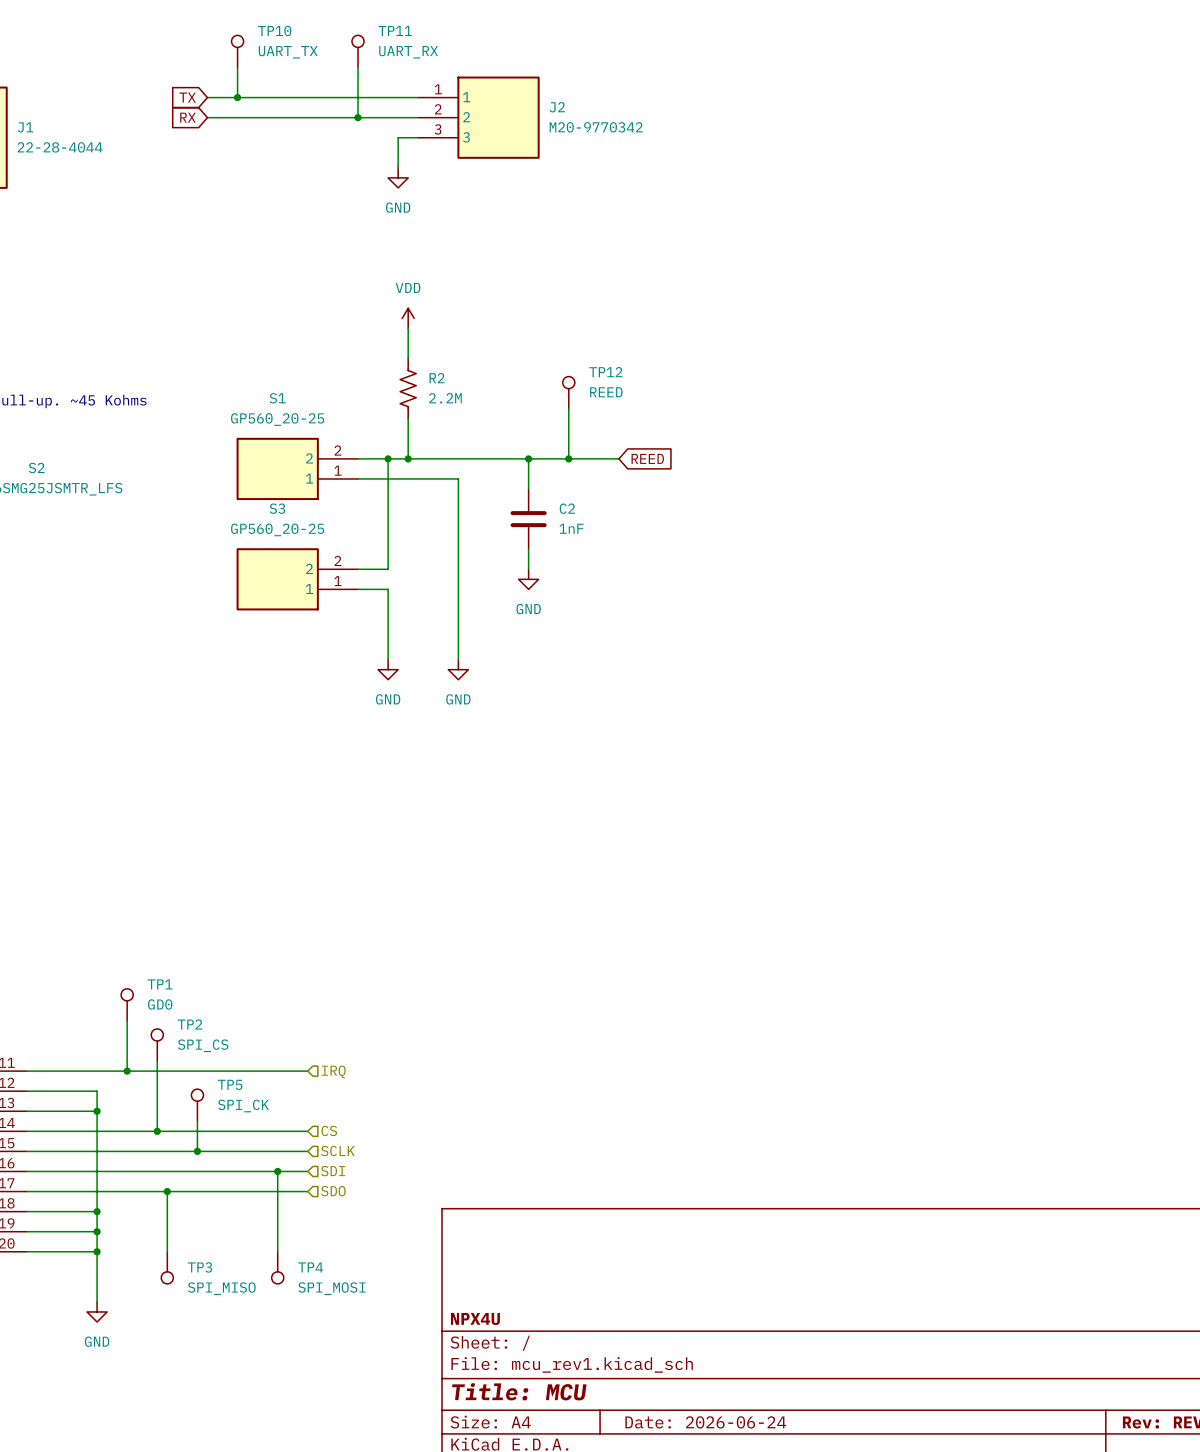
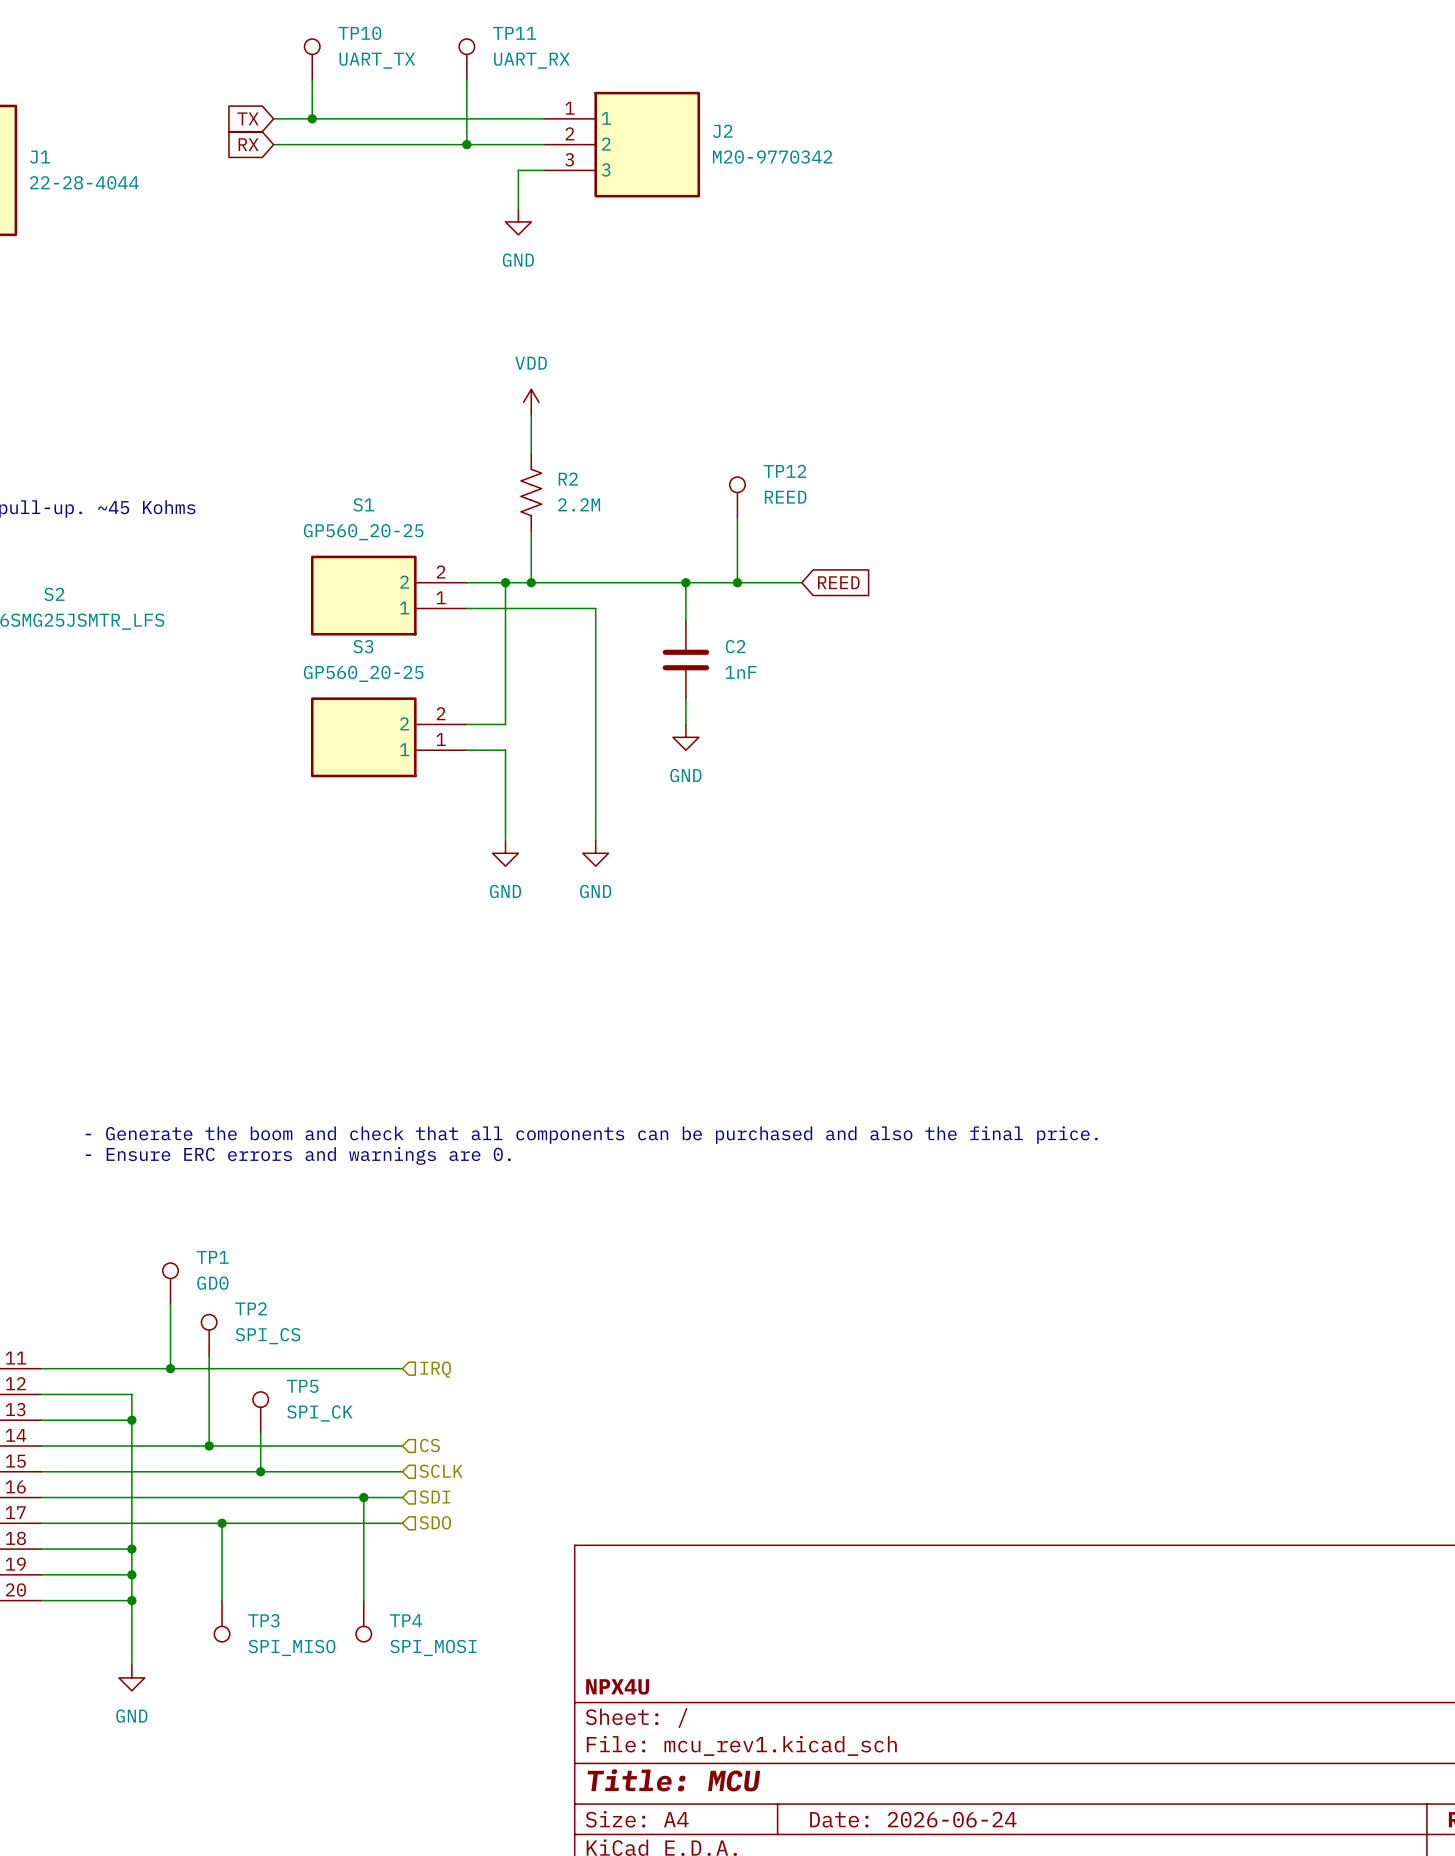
text: none -> - Generate the boom and check that all components can be purchased and also the final price. (591, 1135)
text: none -> - Ensure ERC errors and warnings are 0. (298, 1155)

